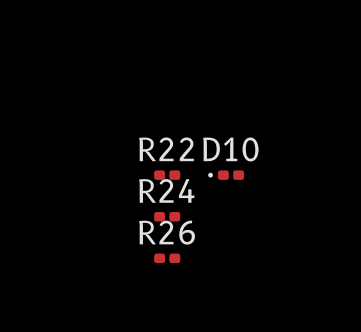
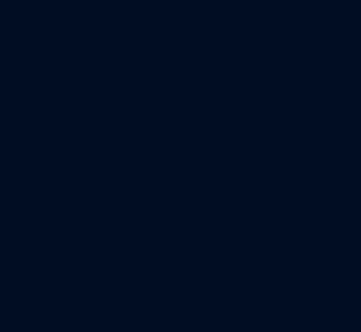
R22: (167, 175) -> none
D10: (226, 175) -> none
R24: (167, 216) -> none
R26: (167, 258) -> none

